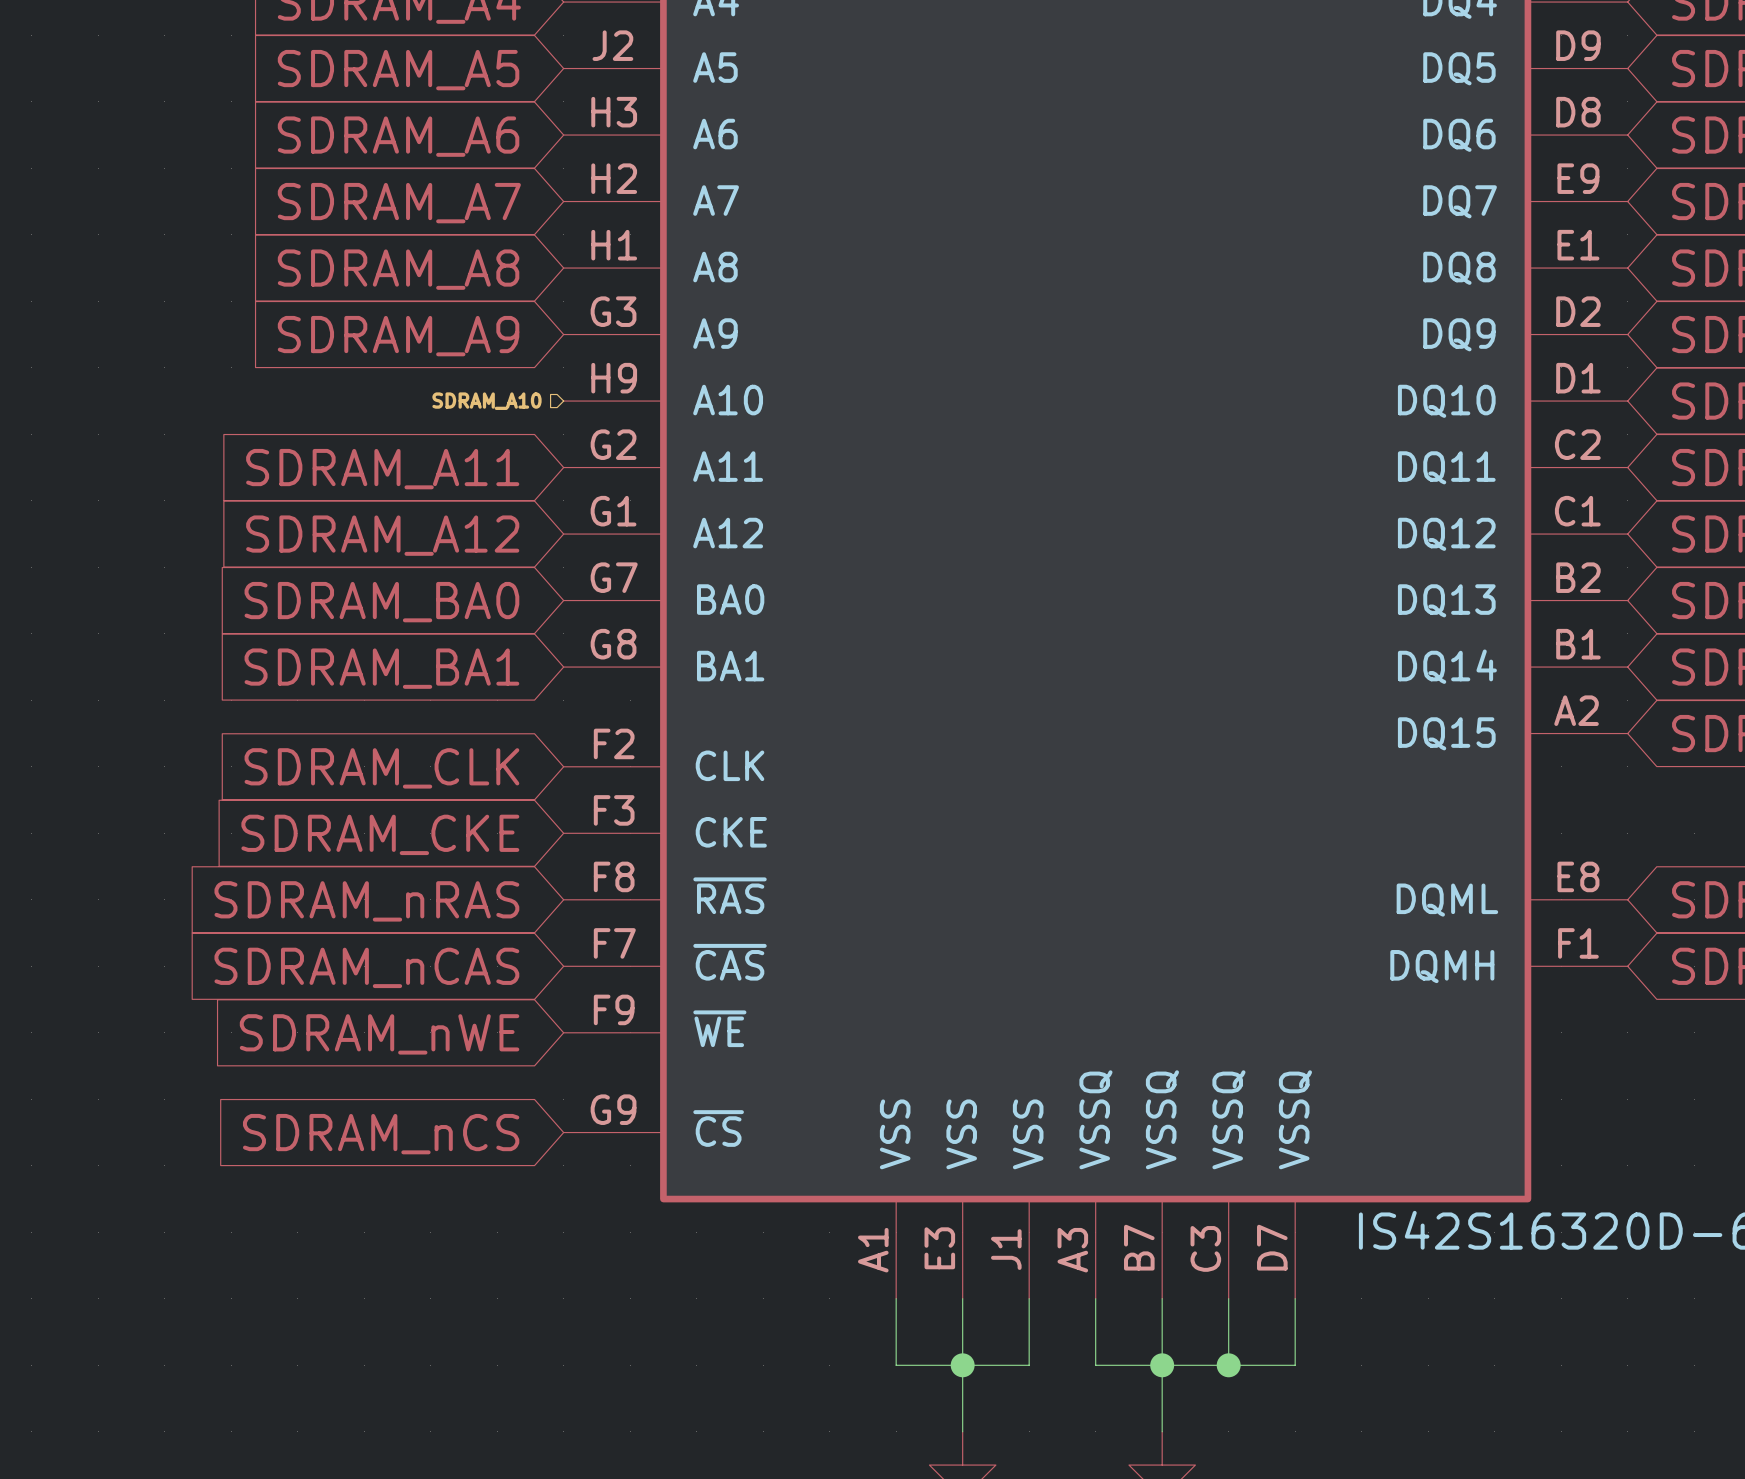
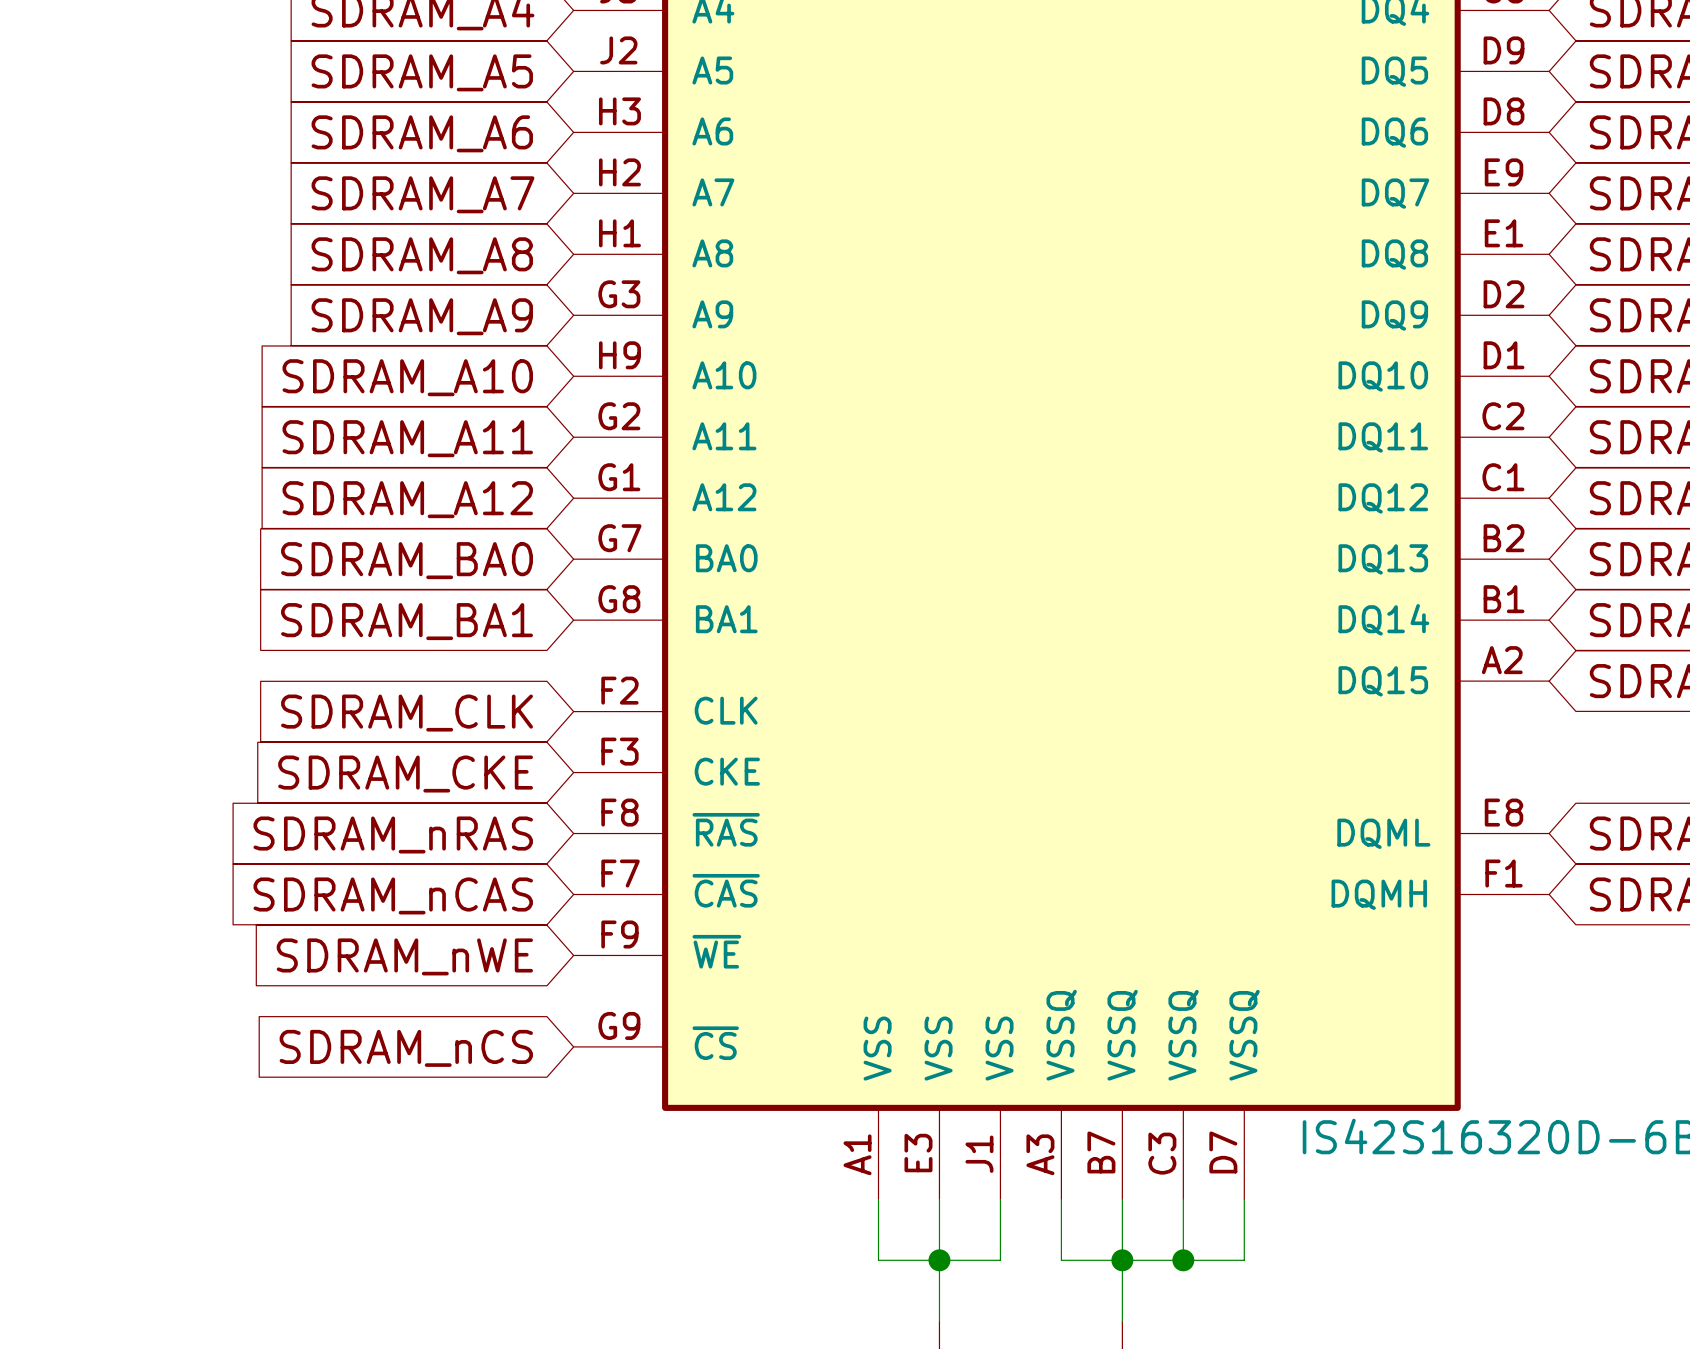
hierarchical label: SDRAM_A10 (486, 401) -> none
global label: none -> SDRAM_A10 (407, 377)

